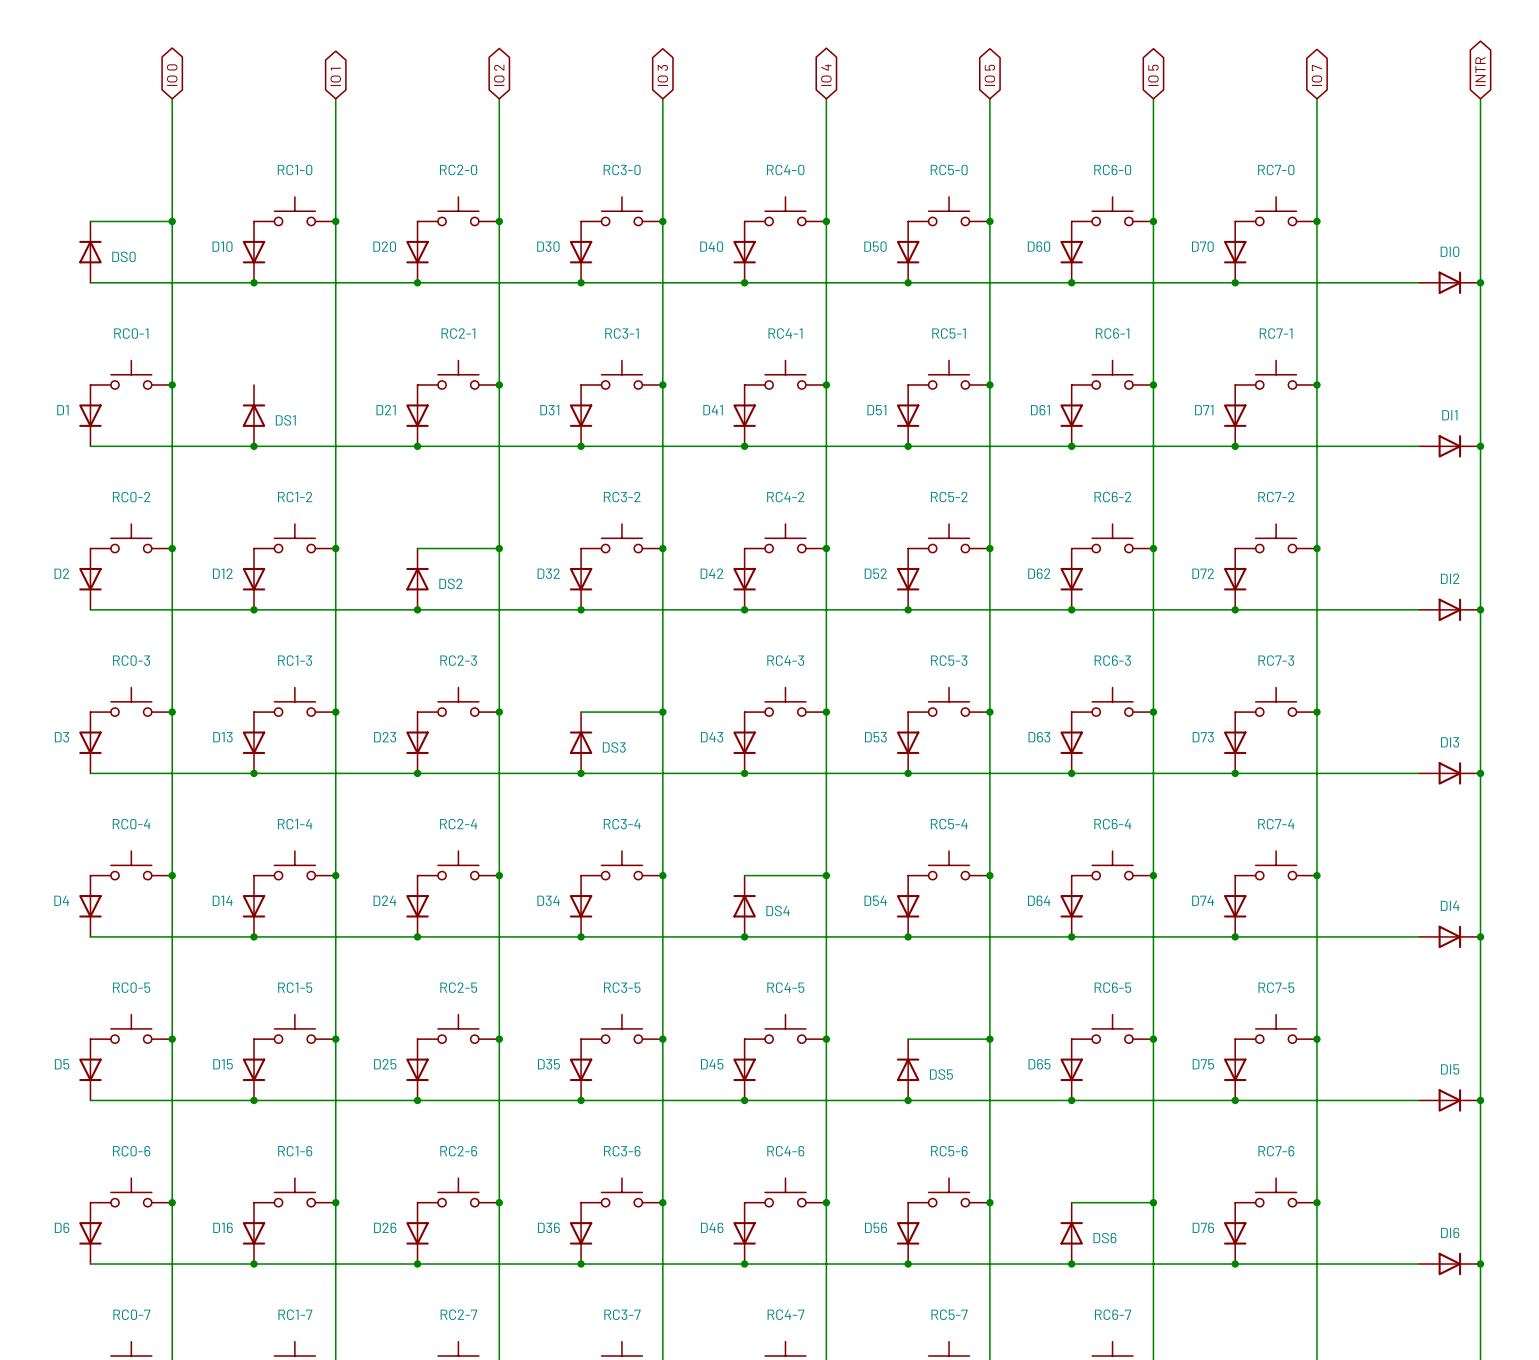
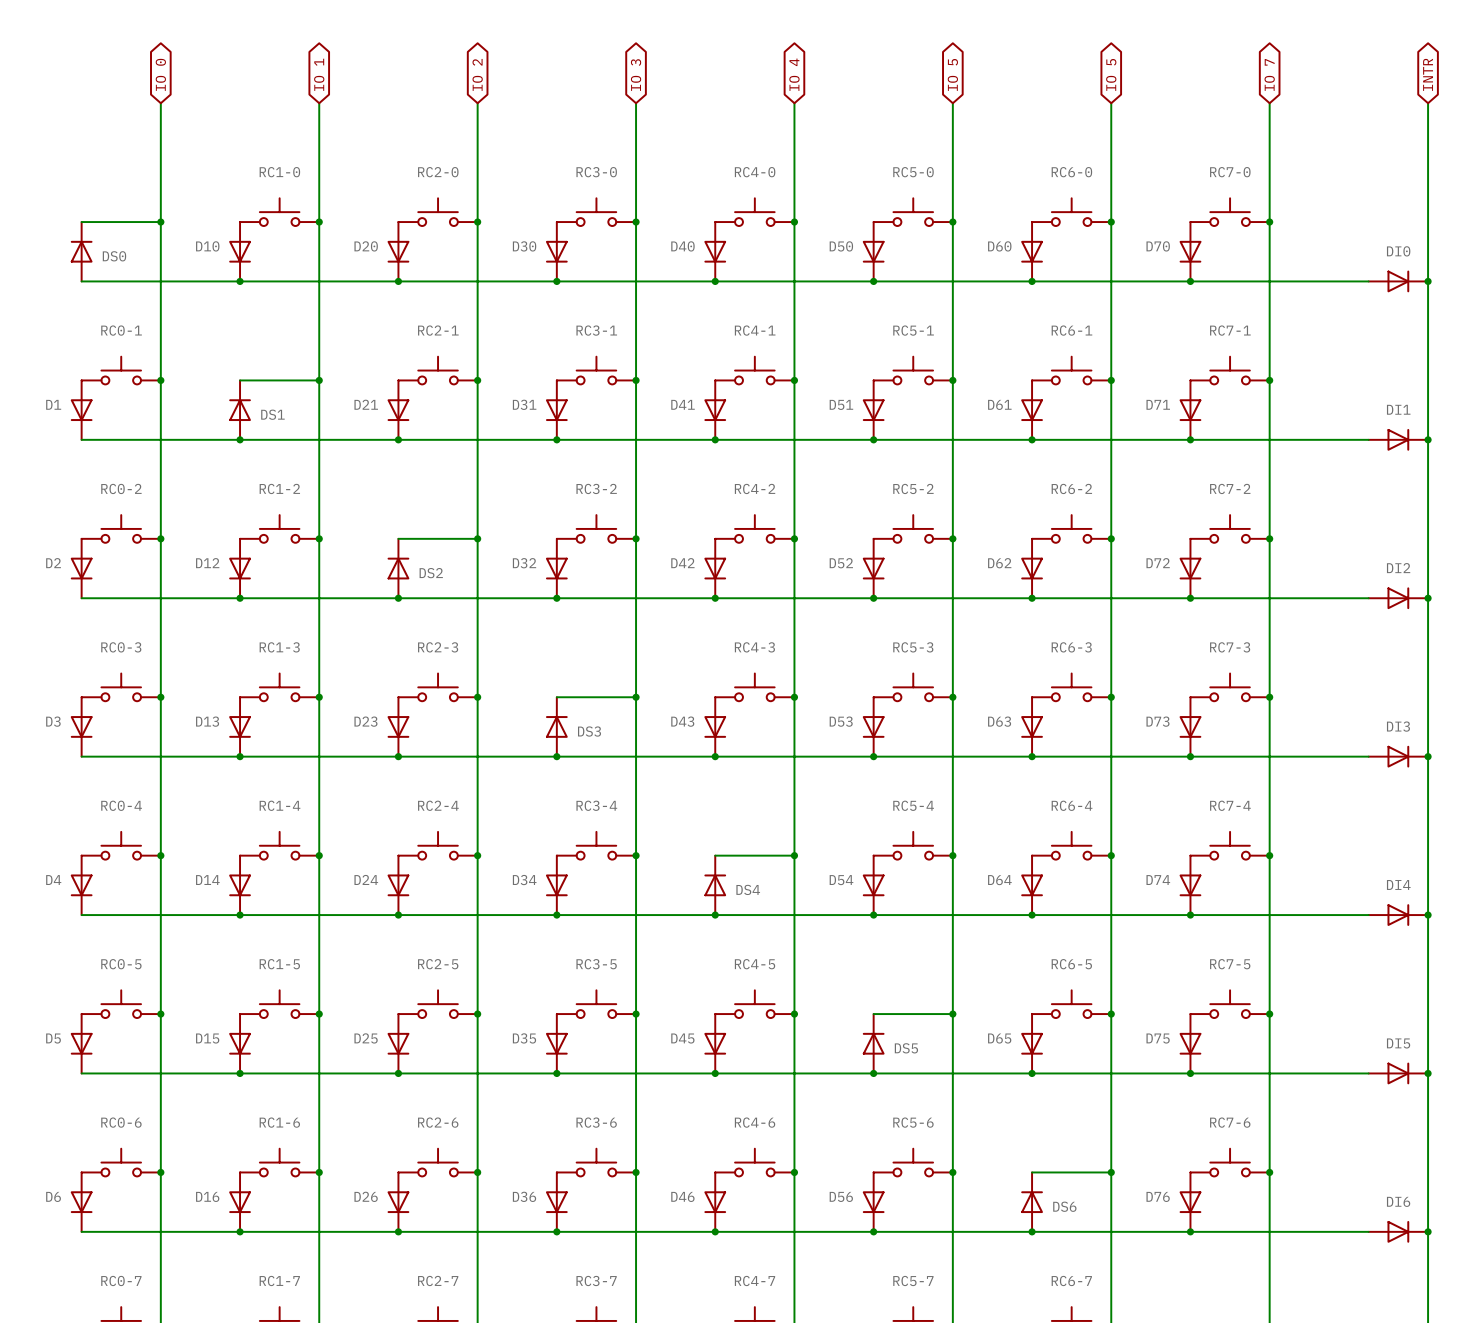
wire: none -> (240, 380) (319, 380)
junction: none -> (319, 380)

